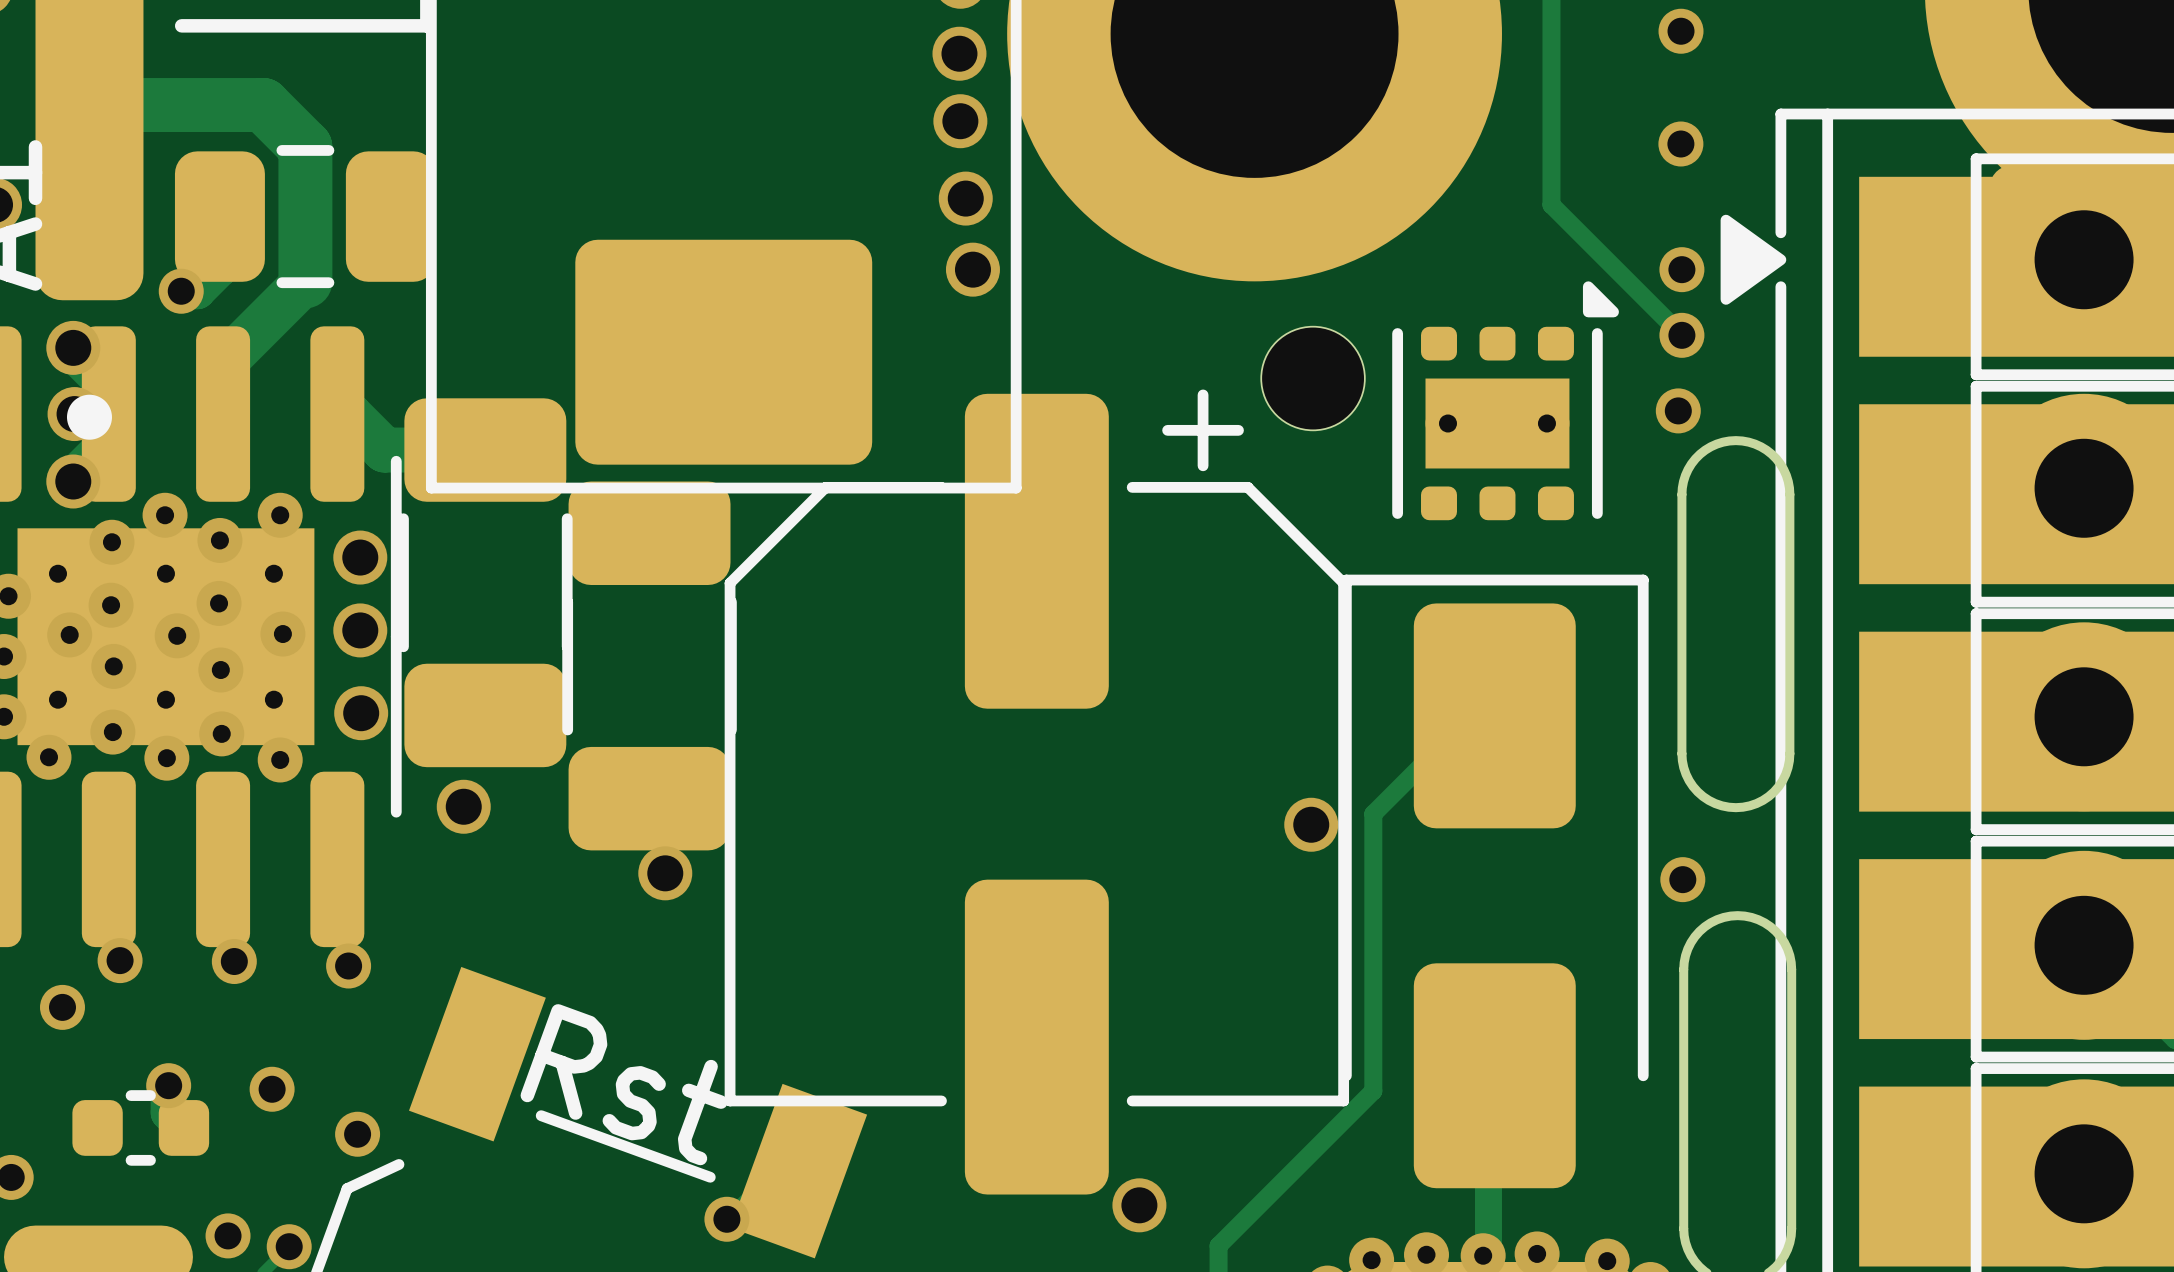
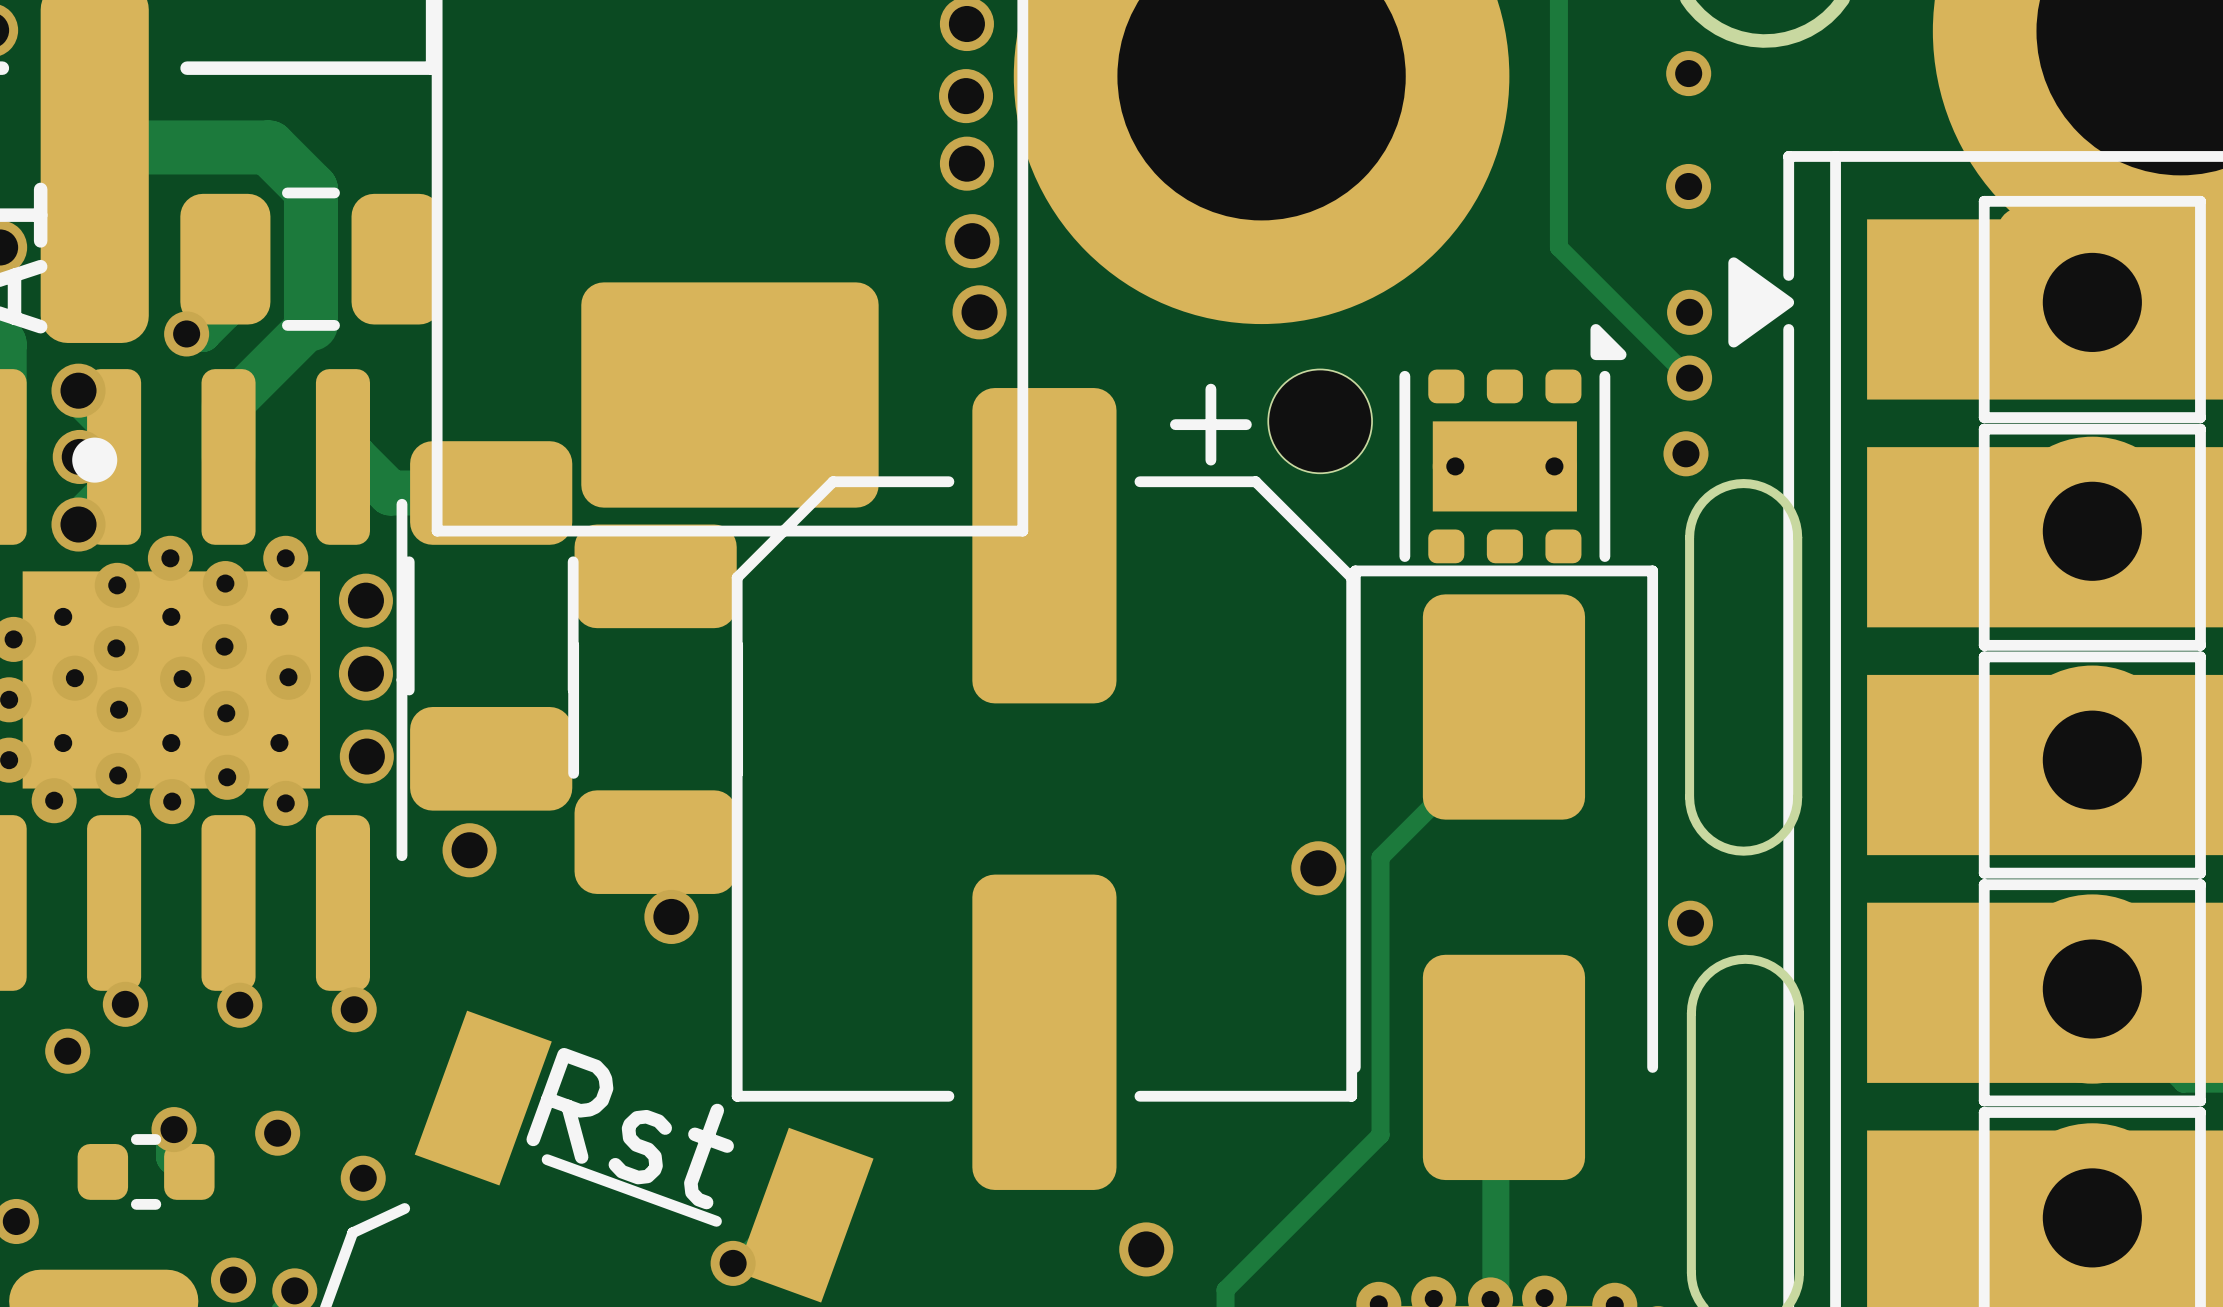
part footprint: [724, 389, 1350, 1195] -> [731, 383, 1358, 1190]
part position: (1494, 881) -> (1503, 872)

